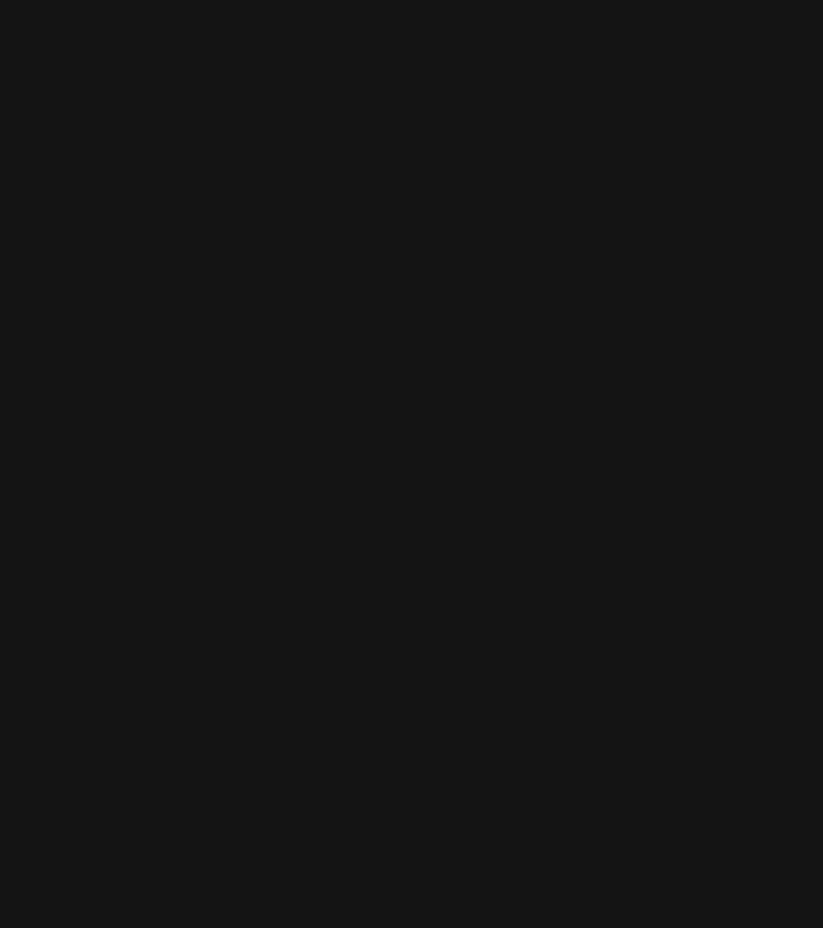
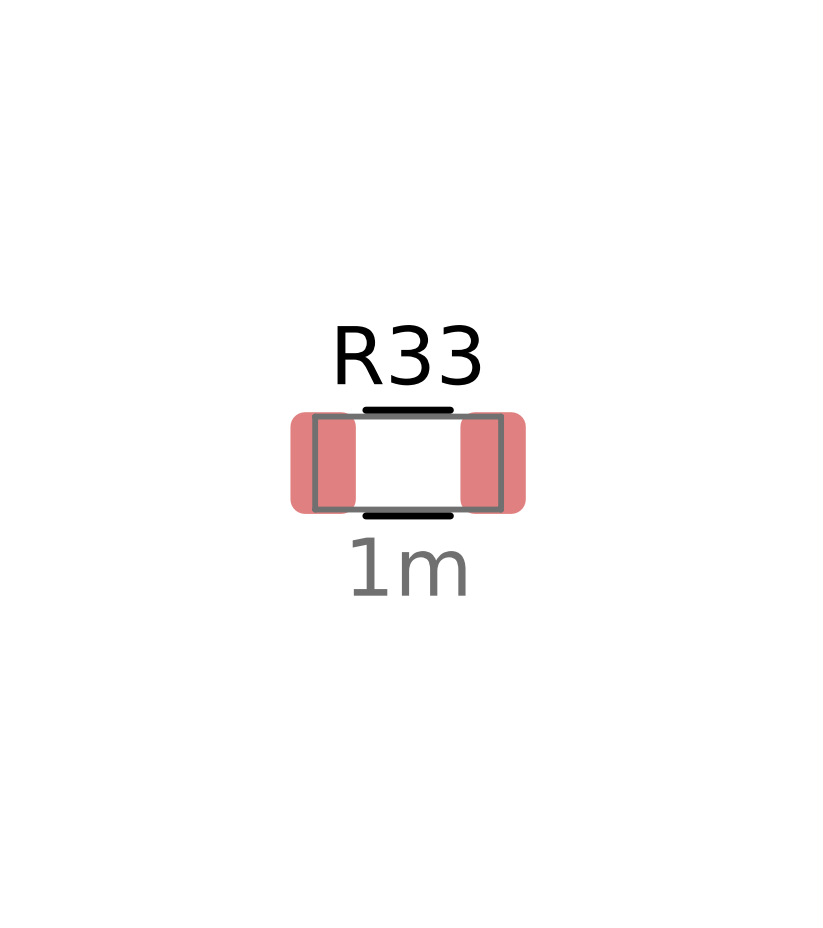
R33: none -> 1m (408, 463)

